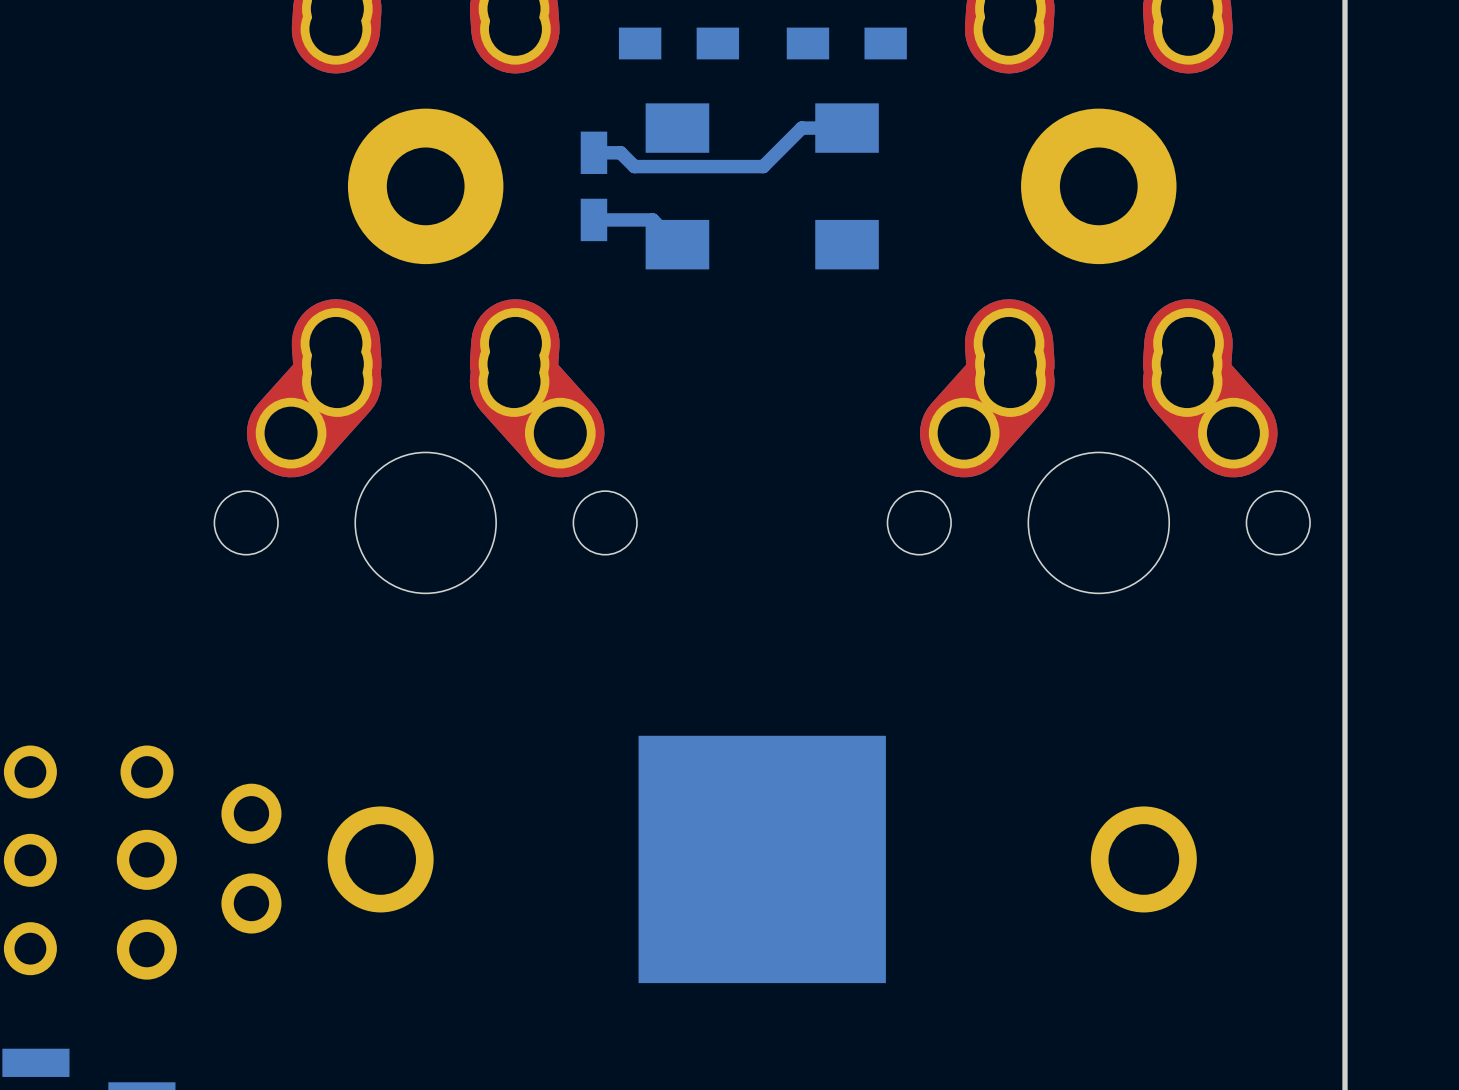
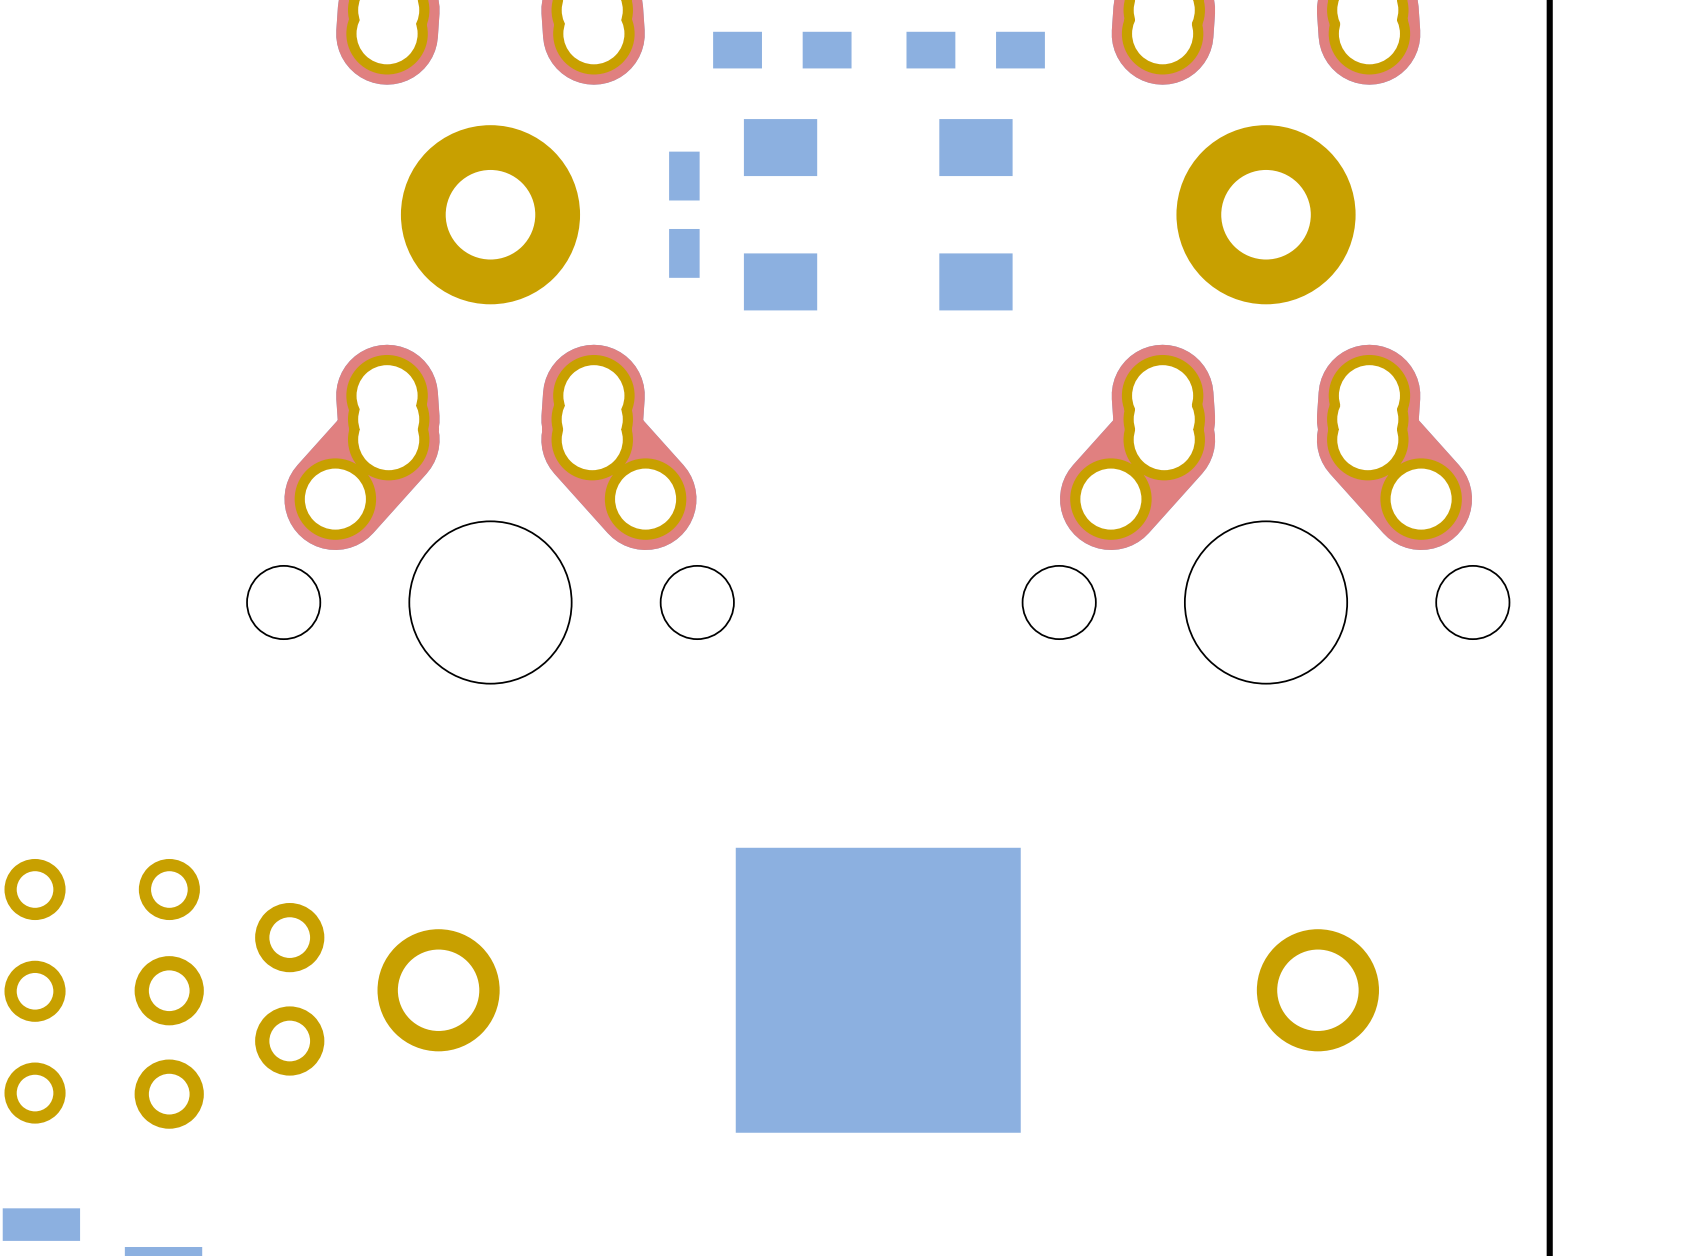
bottom track: (847, 128) (801, 128) (763, 166) (634, 166) (620, 152) (593, 152) -> none
bottom track: (593, 219) (652, 219) (677, 244) -> none

